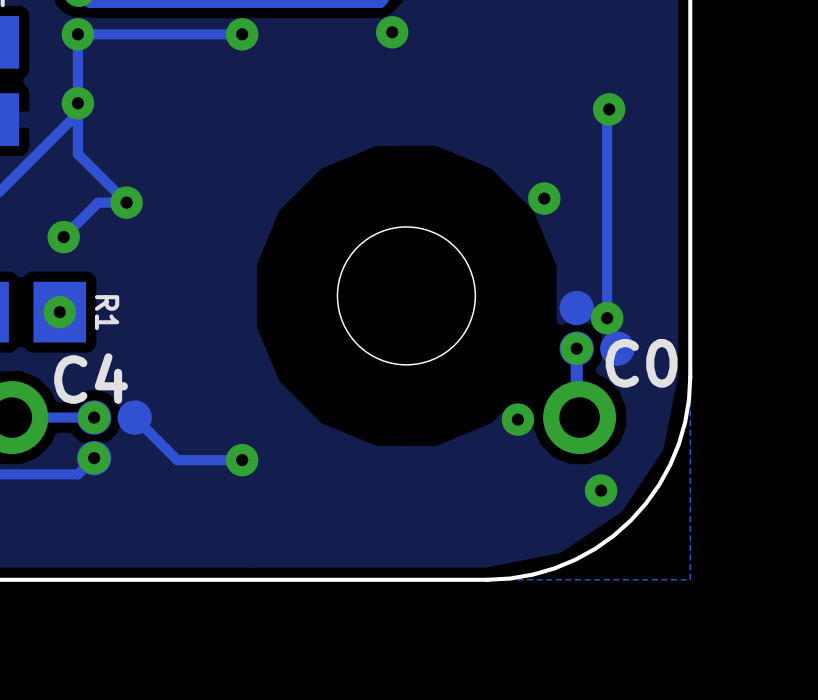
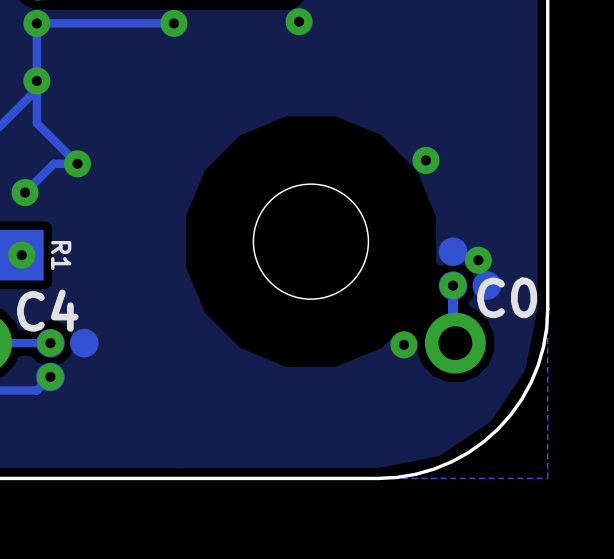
track: (609, 109) (607, 111) (607, 318) -> none
via: (609, 109) -> none
track: (134, 417) (177, 460) (242, 460) -> none
via: (242, 460) -> none
via: (601, 490) -> none

